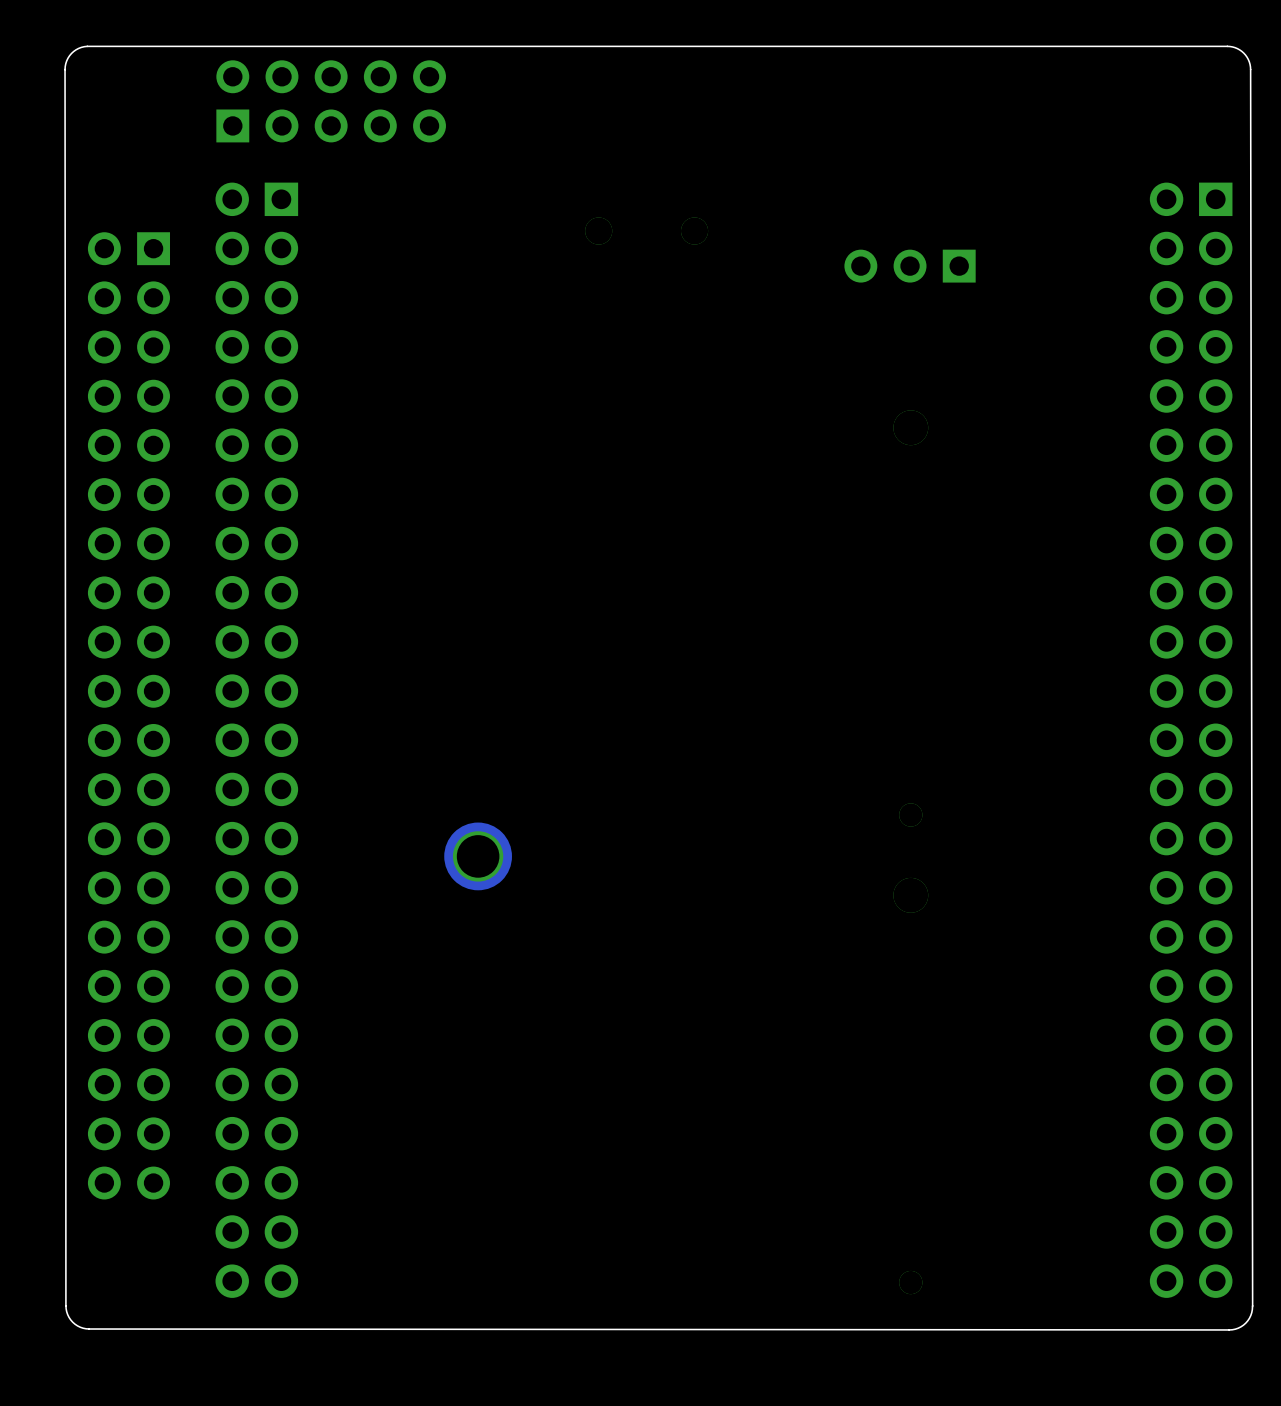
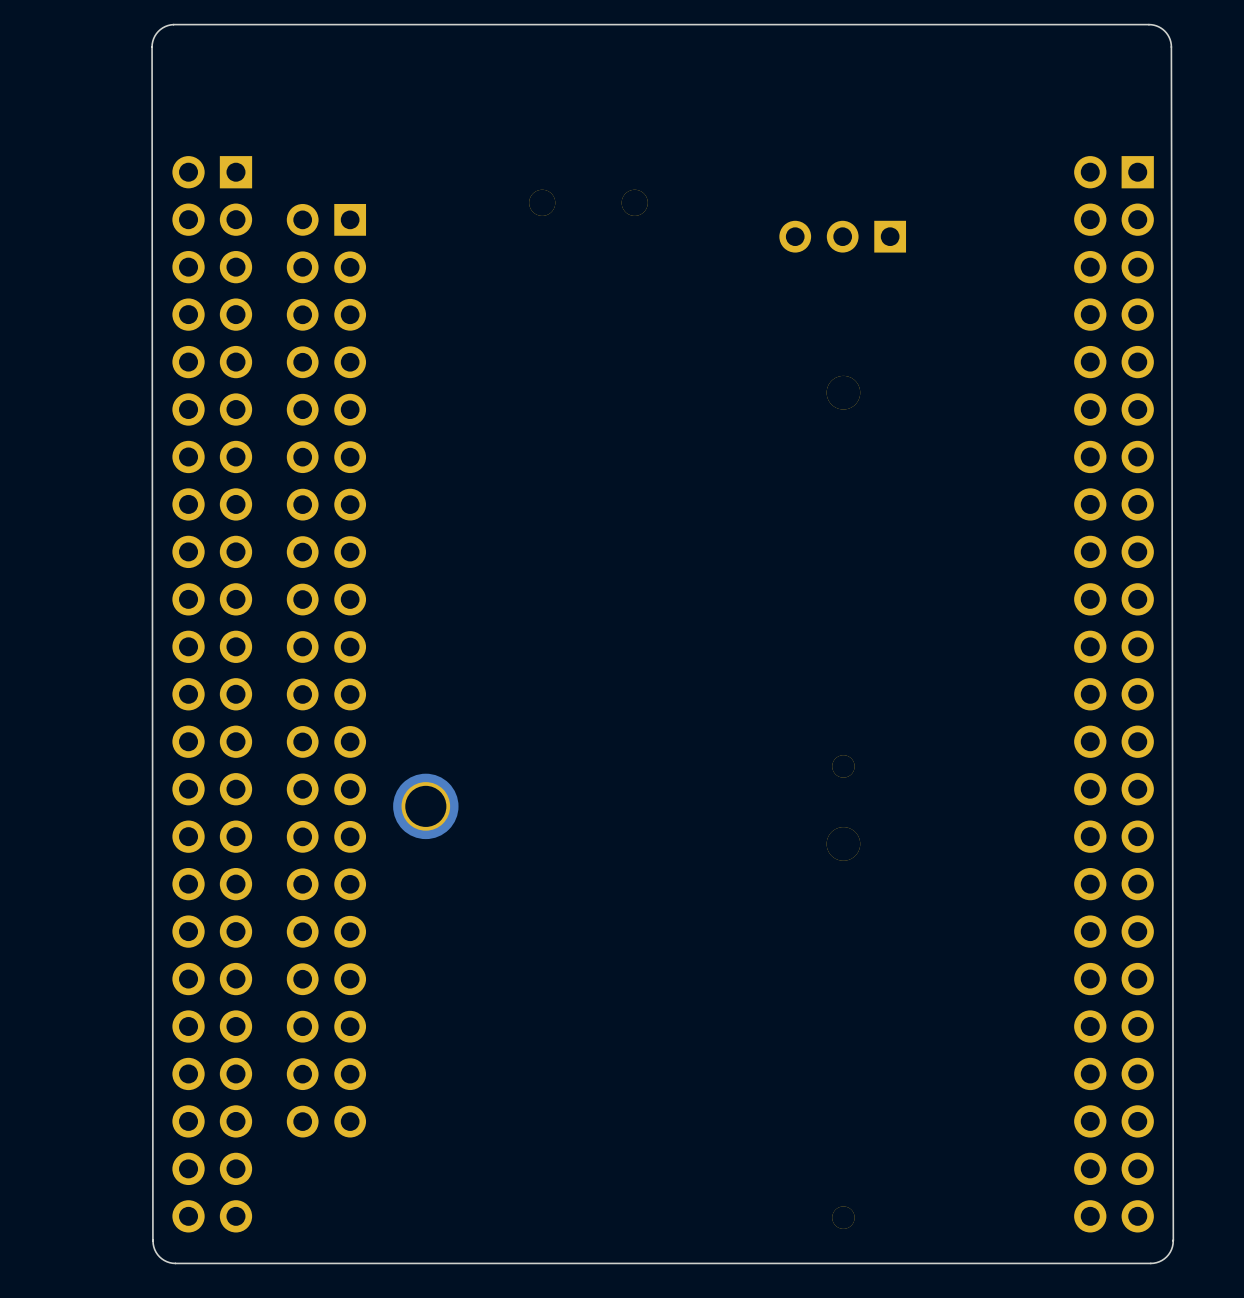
board edge: (216, 46) (84, 46) (71, 53) (65, 66) (65, 1305) (70, 1319) (77, 1325) (89, 1329) (1229, 1329) -> (173, 24) (165, 26) (158, 31) (153, 38) (152, 47) (152, 1240) (157, 1254) (166, 1261) (175, 1263) (1150, 1263)
part: (331, 101) -> none
part position: (128, 715) -> (326, 670)

